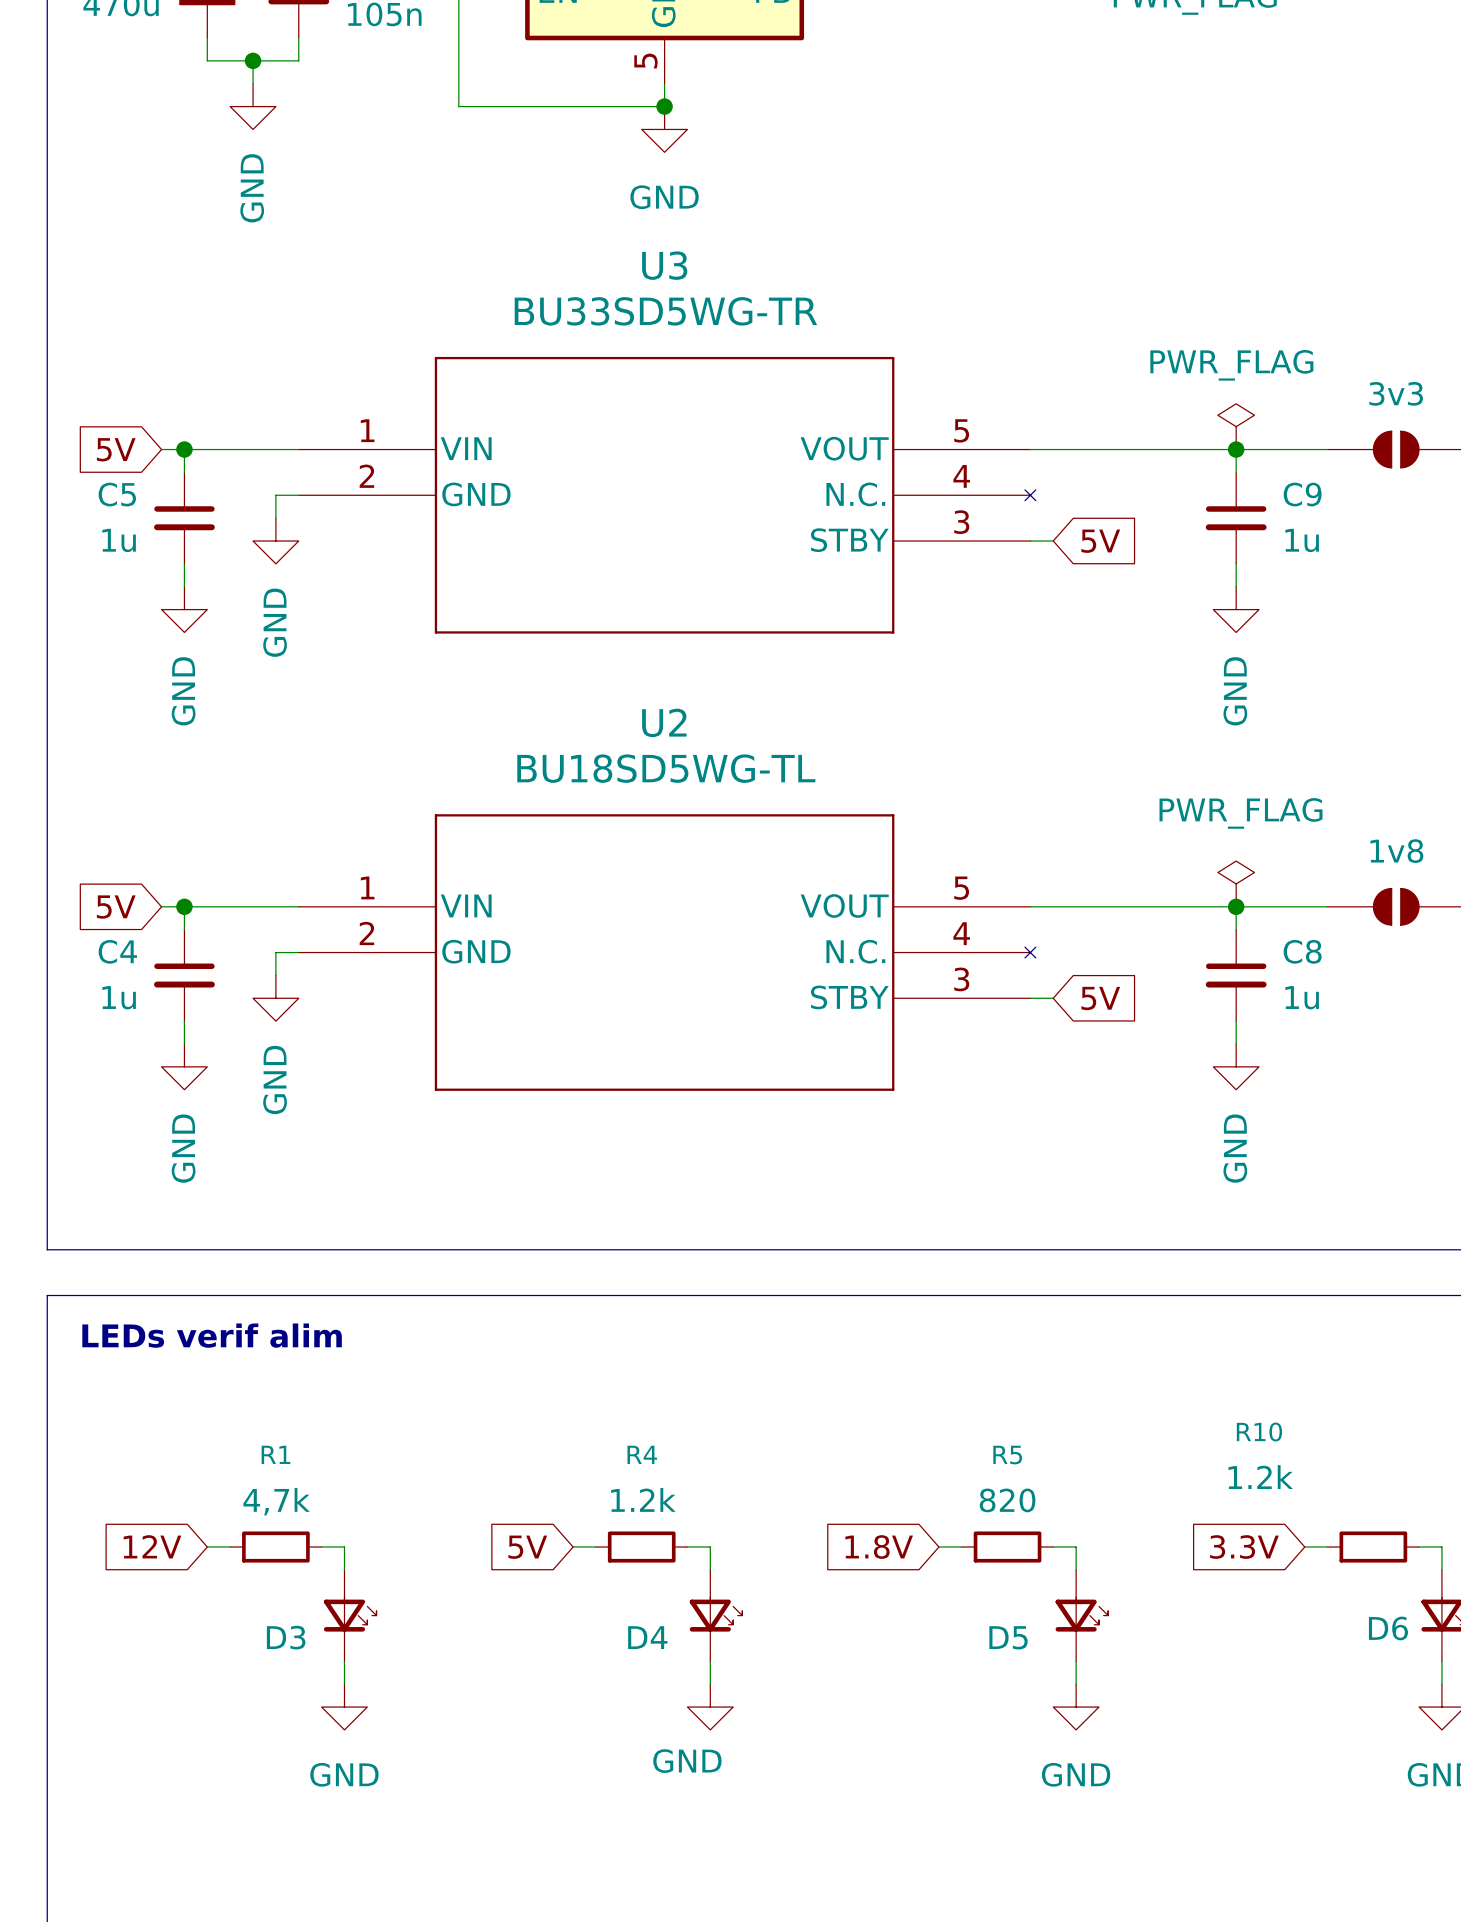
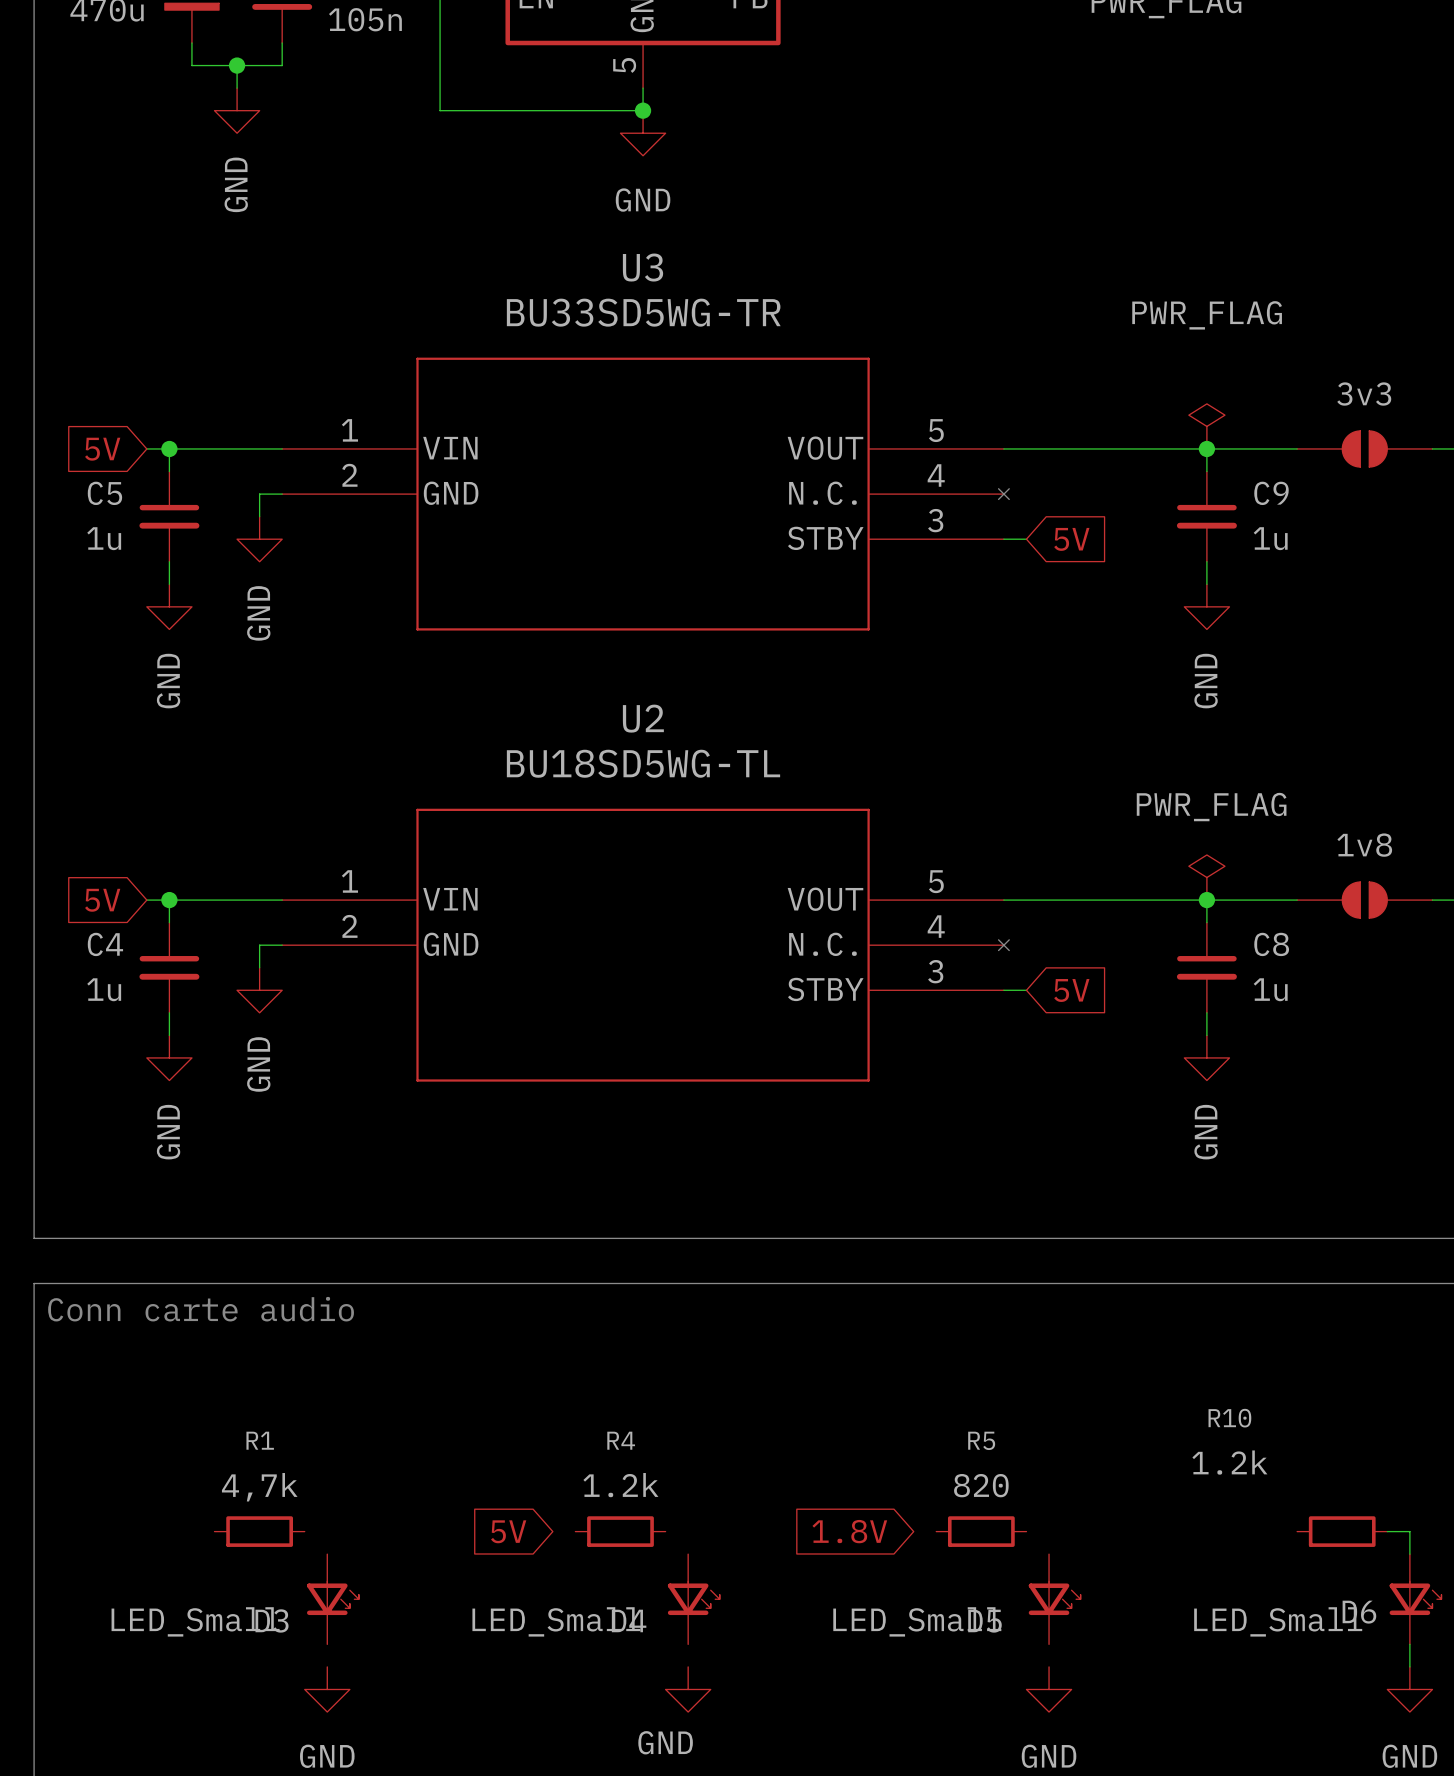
power symbol text position: PWR_FLAG (1231, 365) -> PWR_FLAG (1207, 315)
text: LEDs verif alim (212, 1335) -> Conn carte audio (201, 1309)
global label: 12V (152, 1546) -> none
wire: (207, 1547) (230, 1547) -> none
wire: (321, 1547) (344, 1547) (344, 1569) -> none
wire: (573, 1547) (595, 1547) -> none
wire: (687, 1547) (710, 1547) (710, 1569) -> none
wire: (938, 1547) (961, 1547) -> none
wire: (1053, 1547) (1076, 1547) (1076, 1569) -> none
global label: 3.3V (1244, 1547) -> none
wire: (1304, 1547) (1327, 1547) -> none
D3 value: none -> LED_Small (195, 1621)
D4 value: none -> LED_Small (556, 1621)
D5 value: none -> LED_Small (917, 1621)
D6 value: none -> LED_Small (1278, 1621)
wire: (344, 1661) (344, 1684) -> none
wire: (710, 1661) (710, 1684) -> none
wire: (1076, 1661) (1076, 1684) -> none

